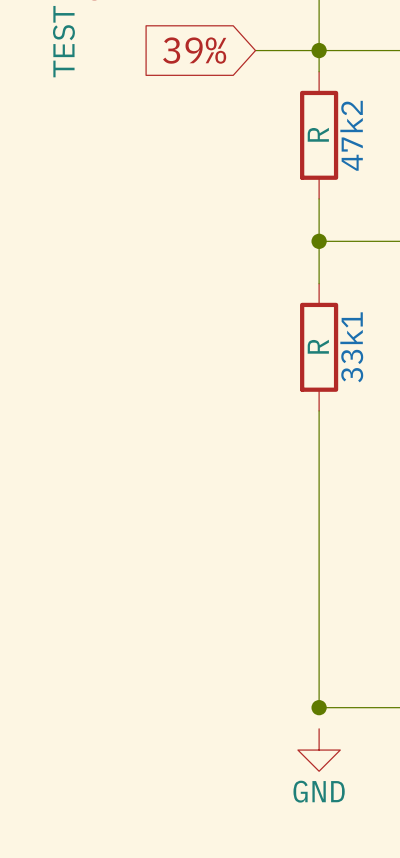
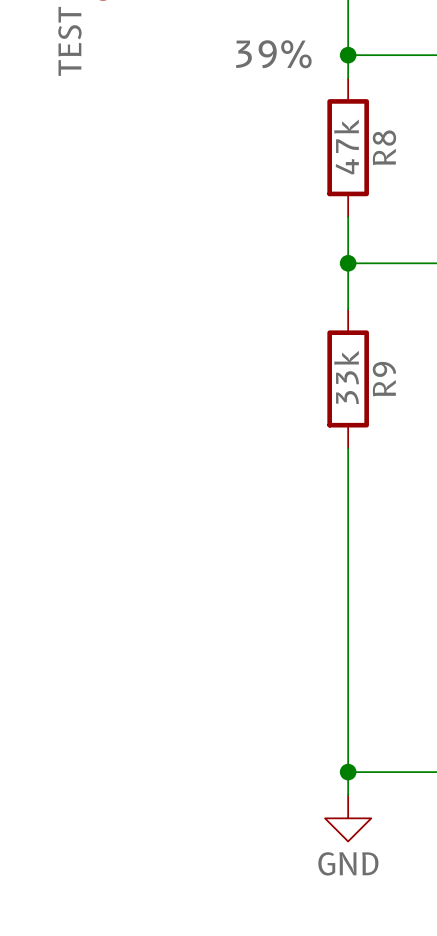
label: none -> 39% (273, 54)
global label: 39% (194, 50) -> none
wire: (255, 50) (319, 50) -> none
47k2 value: R (318, 134) -> 47k (346, 146)
47k2 name: 47k2 (351, 135) -> R8 (384, 147)
33k1 value: R (318, 346) -> 33k (346, 377)
33k1 name: 33k1 (351, 347) -> R9 (384, 379)
wire: none -> (348, 772) (348, 795)

